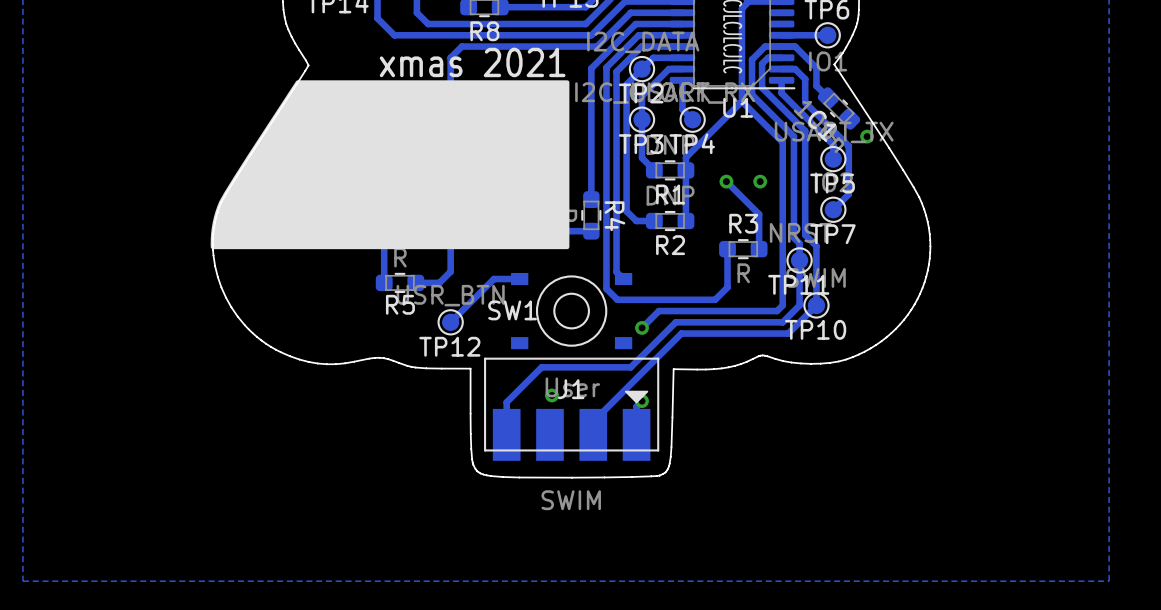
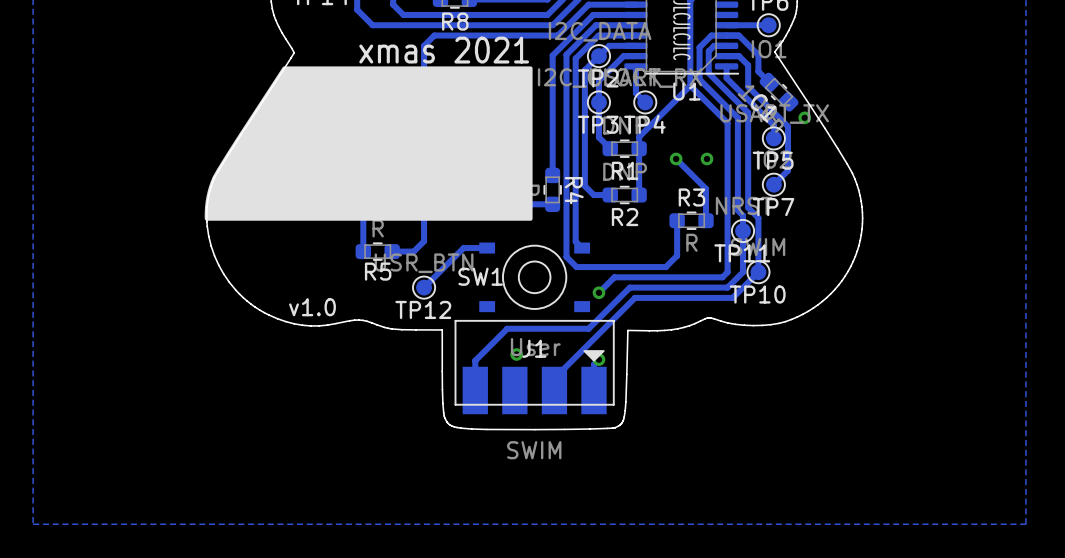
text: none -> v1.0 (312, 307)

